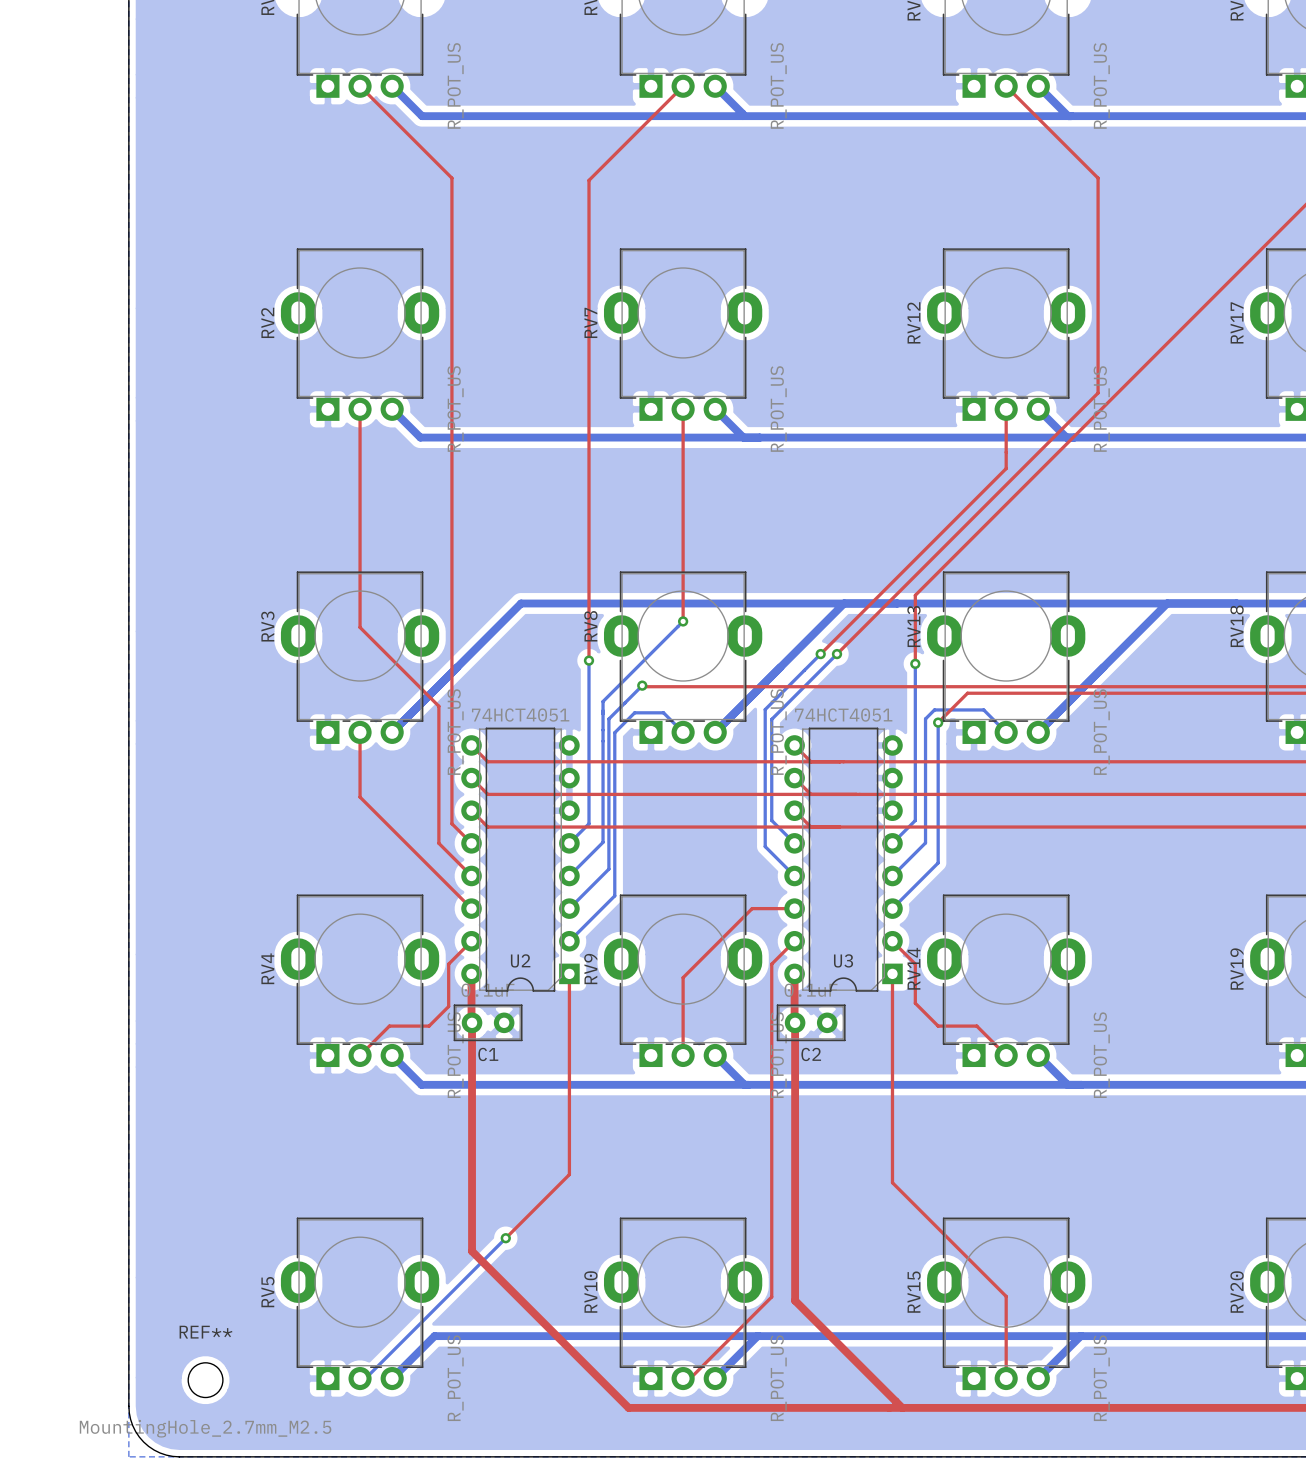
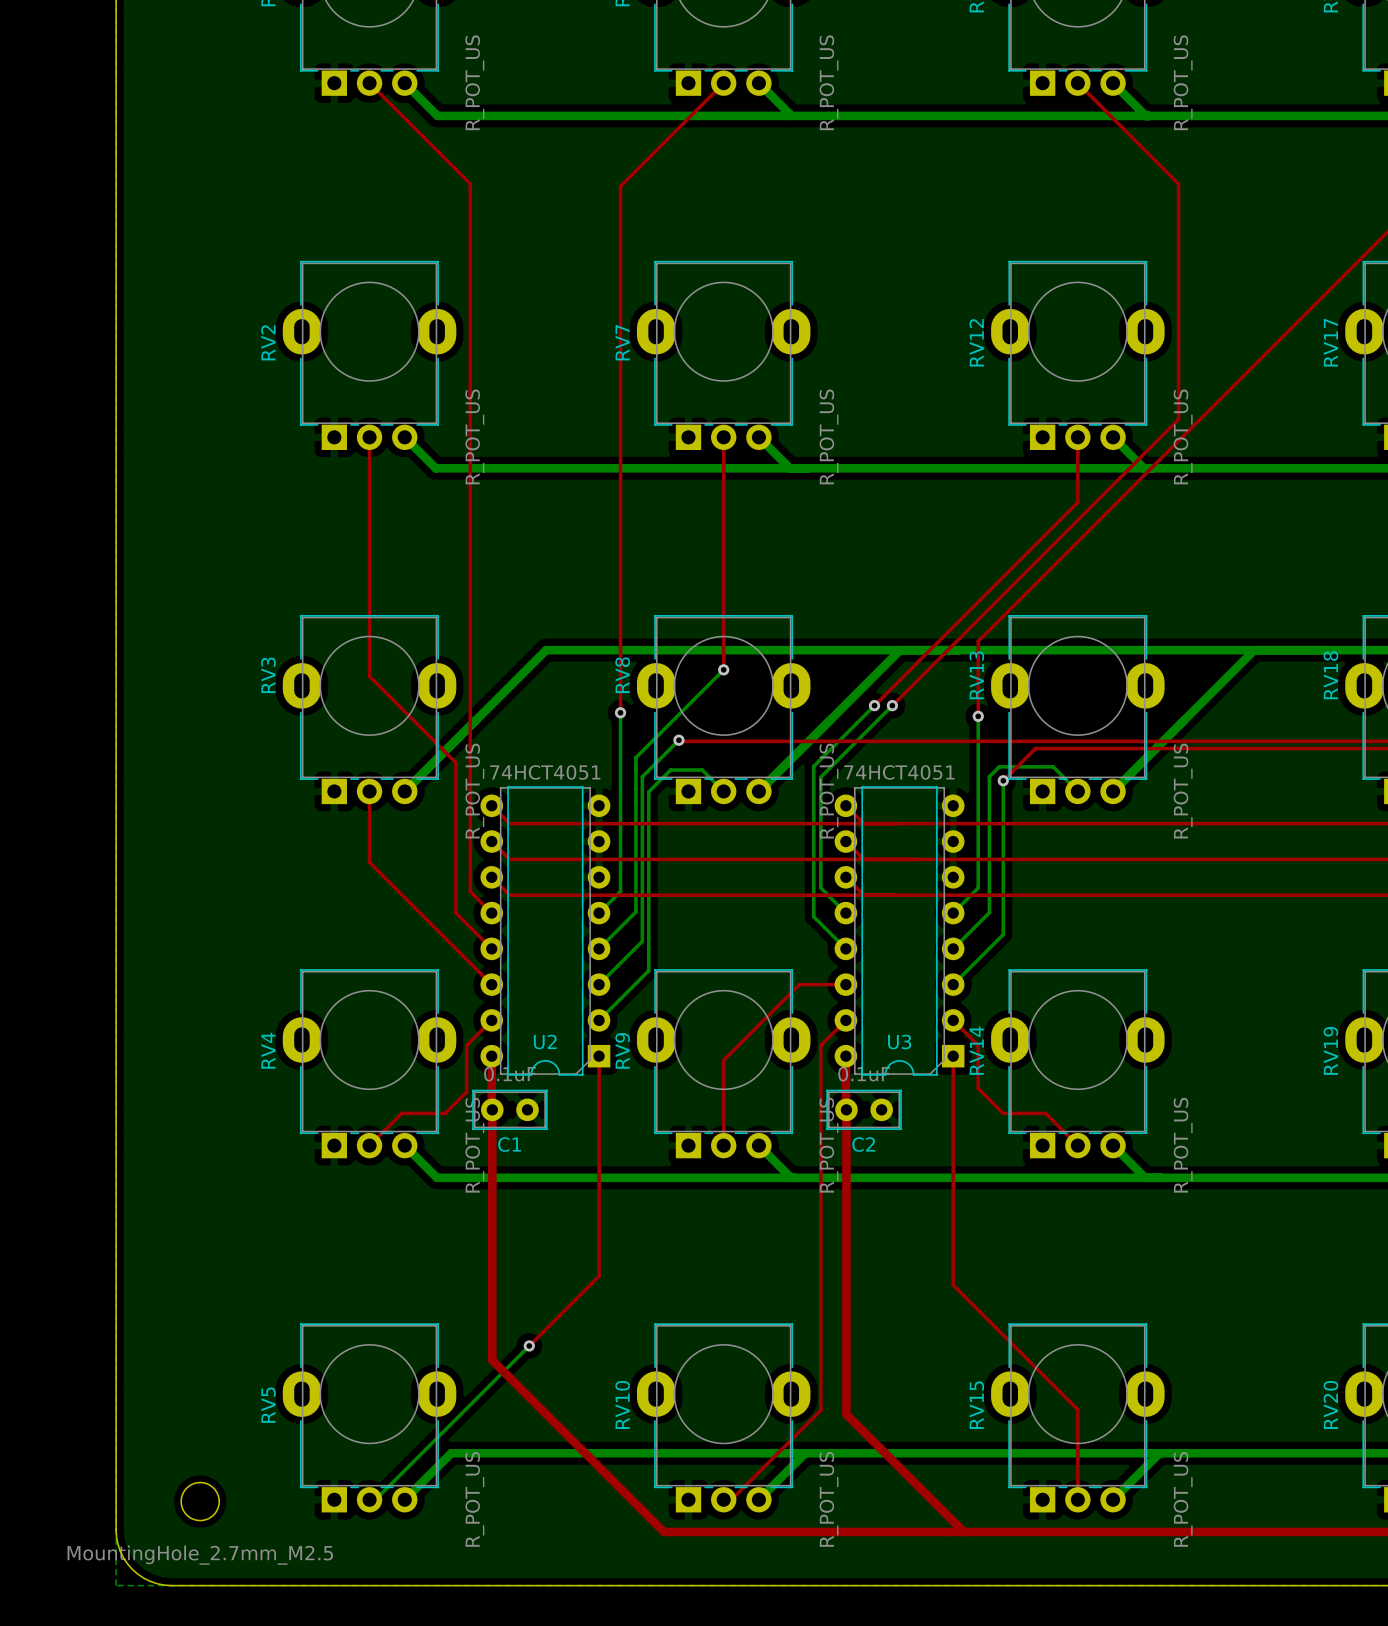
REF** name: REF** (205, 1332) -> none

